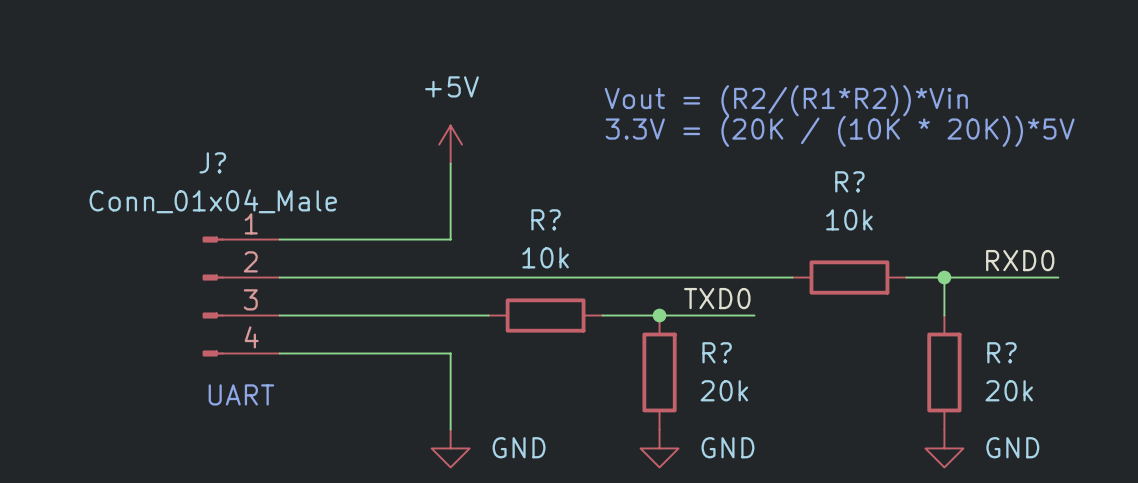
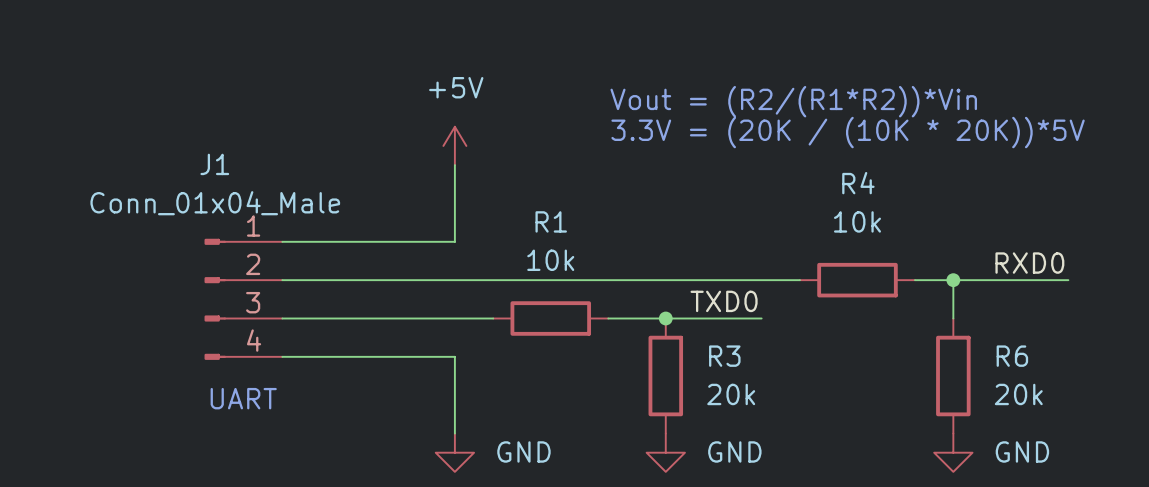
J? name: J? (212, 162) -> J1 (214, 164)
R? name: R? (849, 181) -> R4 (858, 183)
R? name: R? (546, 219) -> R1 (551, 221)
R? name: R? (717, 352) -> R3 (724, 356)
R? name: R? (1001, 352) -> R6 (1012, 356)

